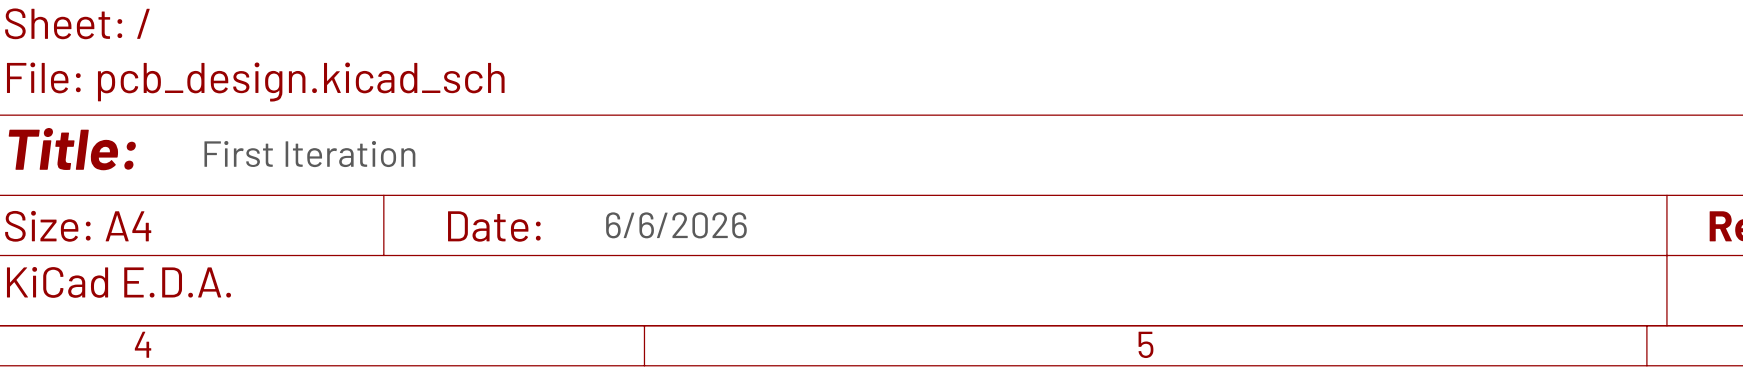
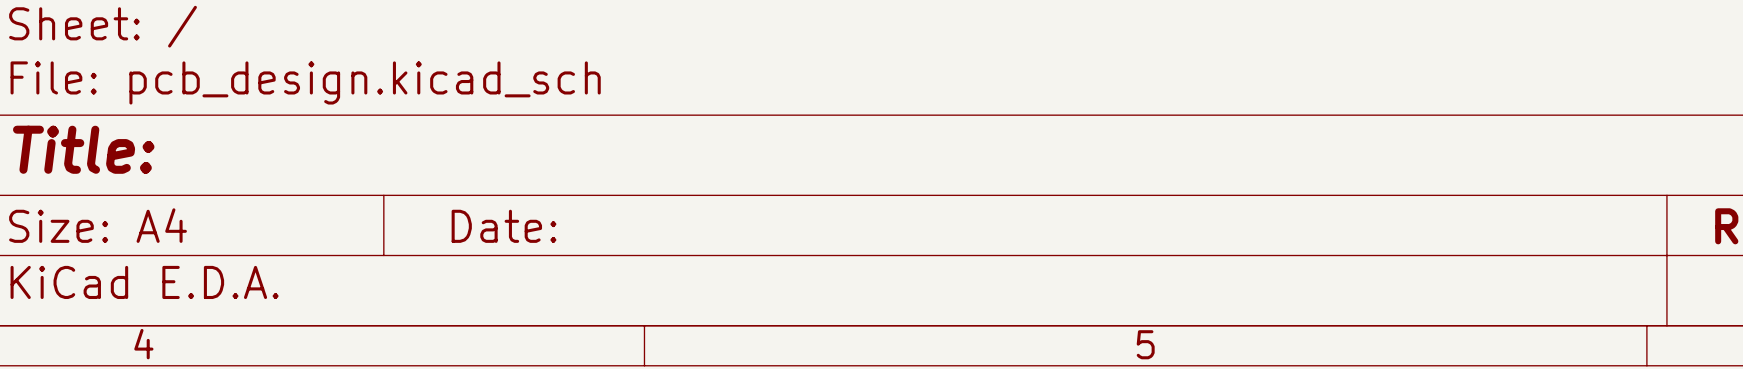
text: First Iteration (309, 154) -> none
text: 6/6/2026 (676, 225) -> none

